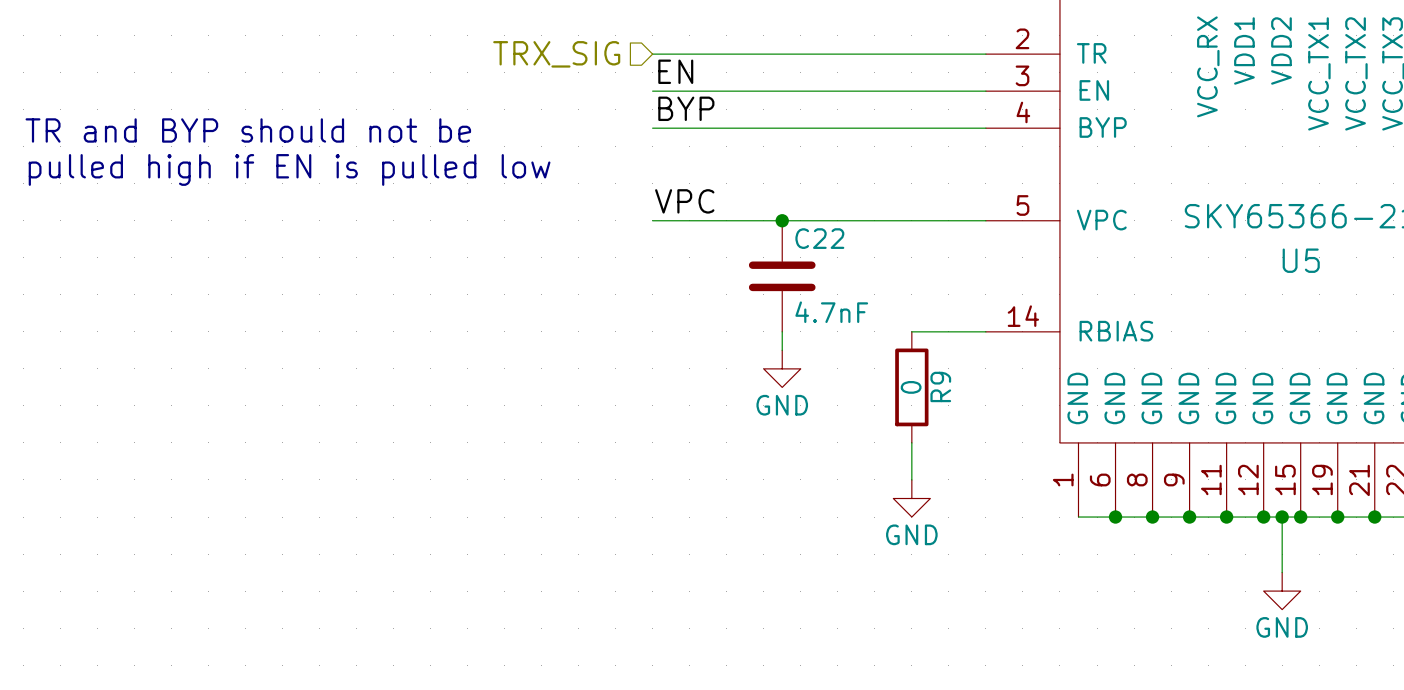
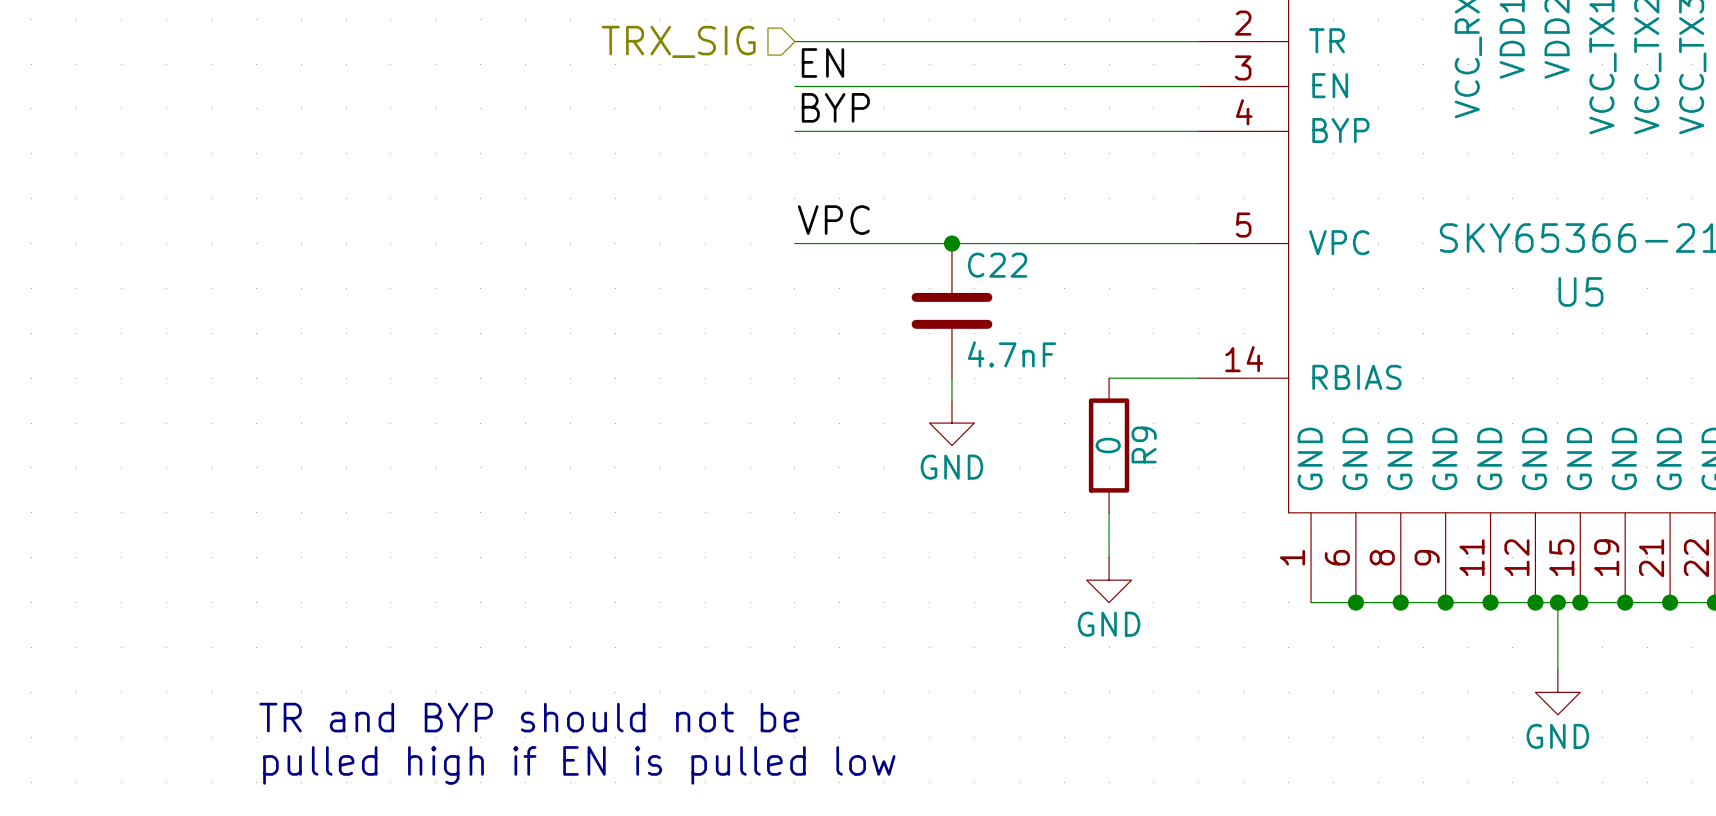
text: TR and BYP should not be (248, 130) -> none
text: pulled high if EN is pulled low (289, 169) -> none
text: none -> TR and BYP should not be (529, 717)
text: none -> pulled high if EN is pulled low (579, 765)

